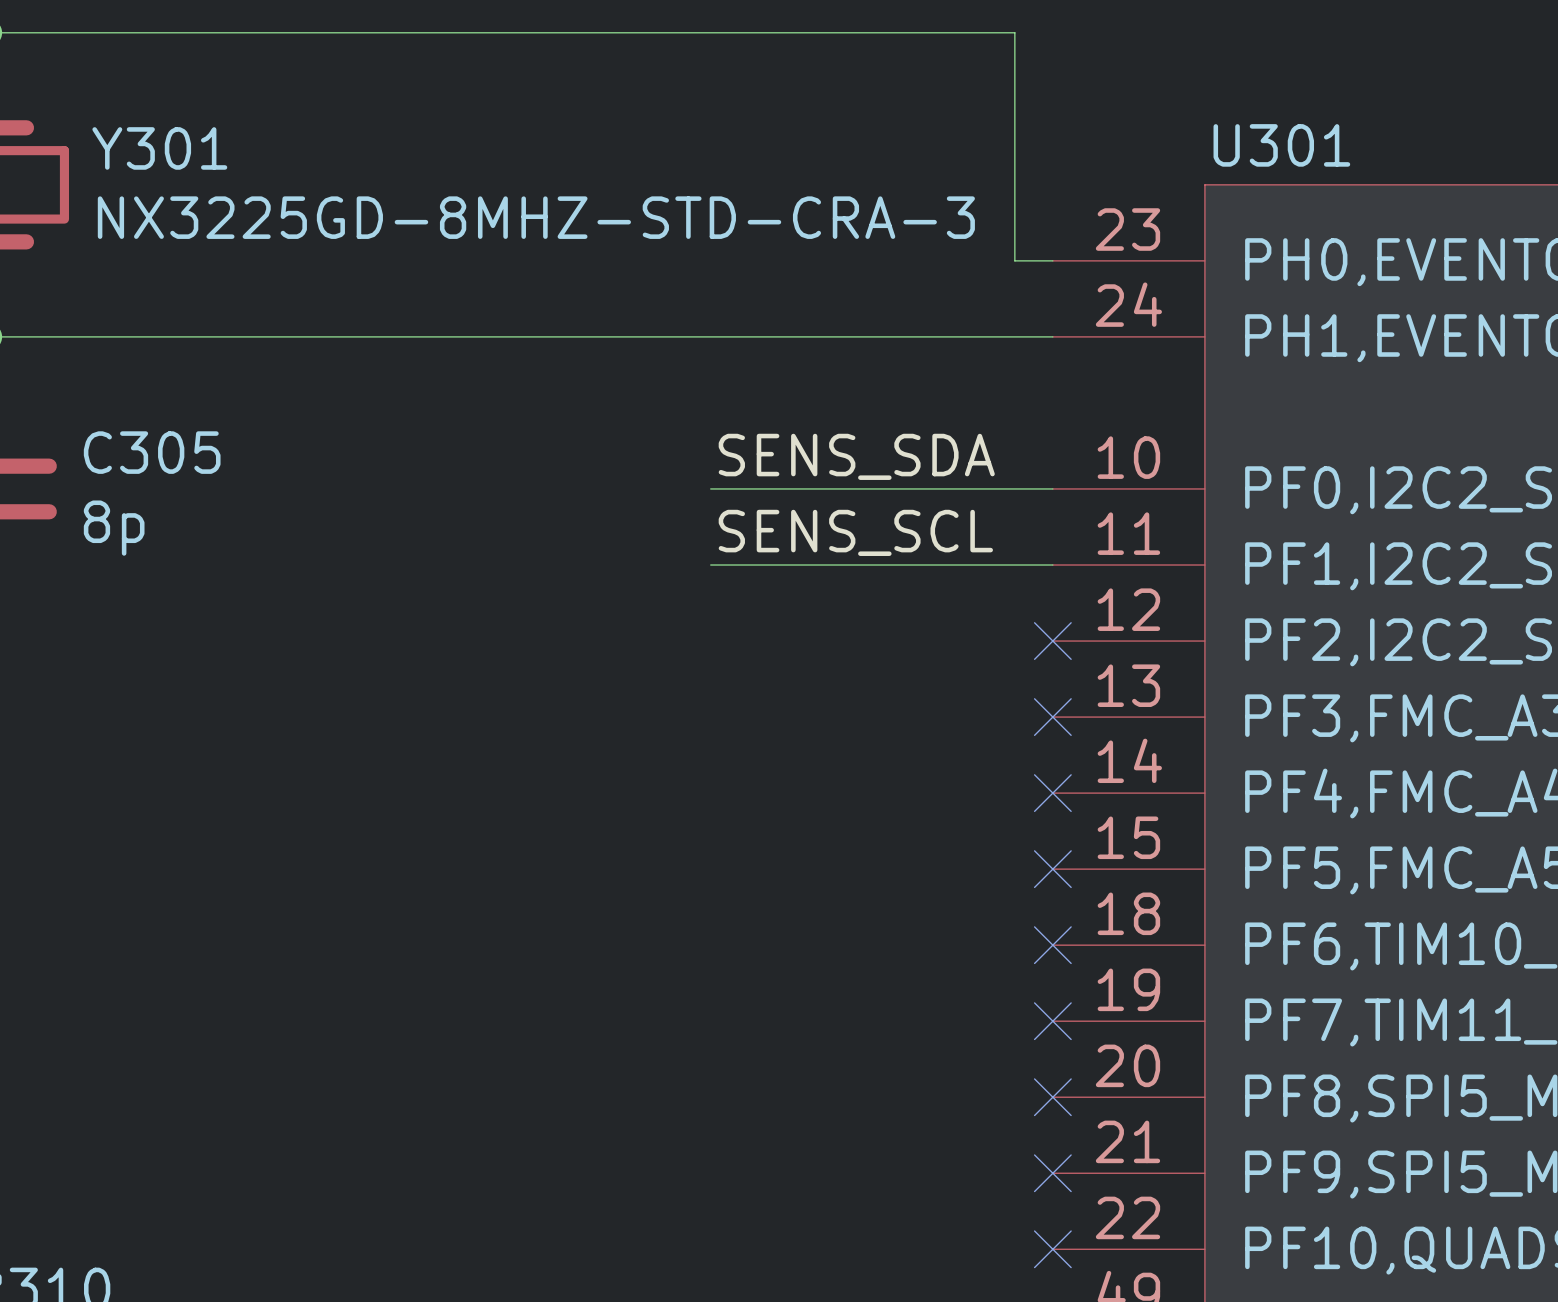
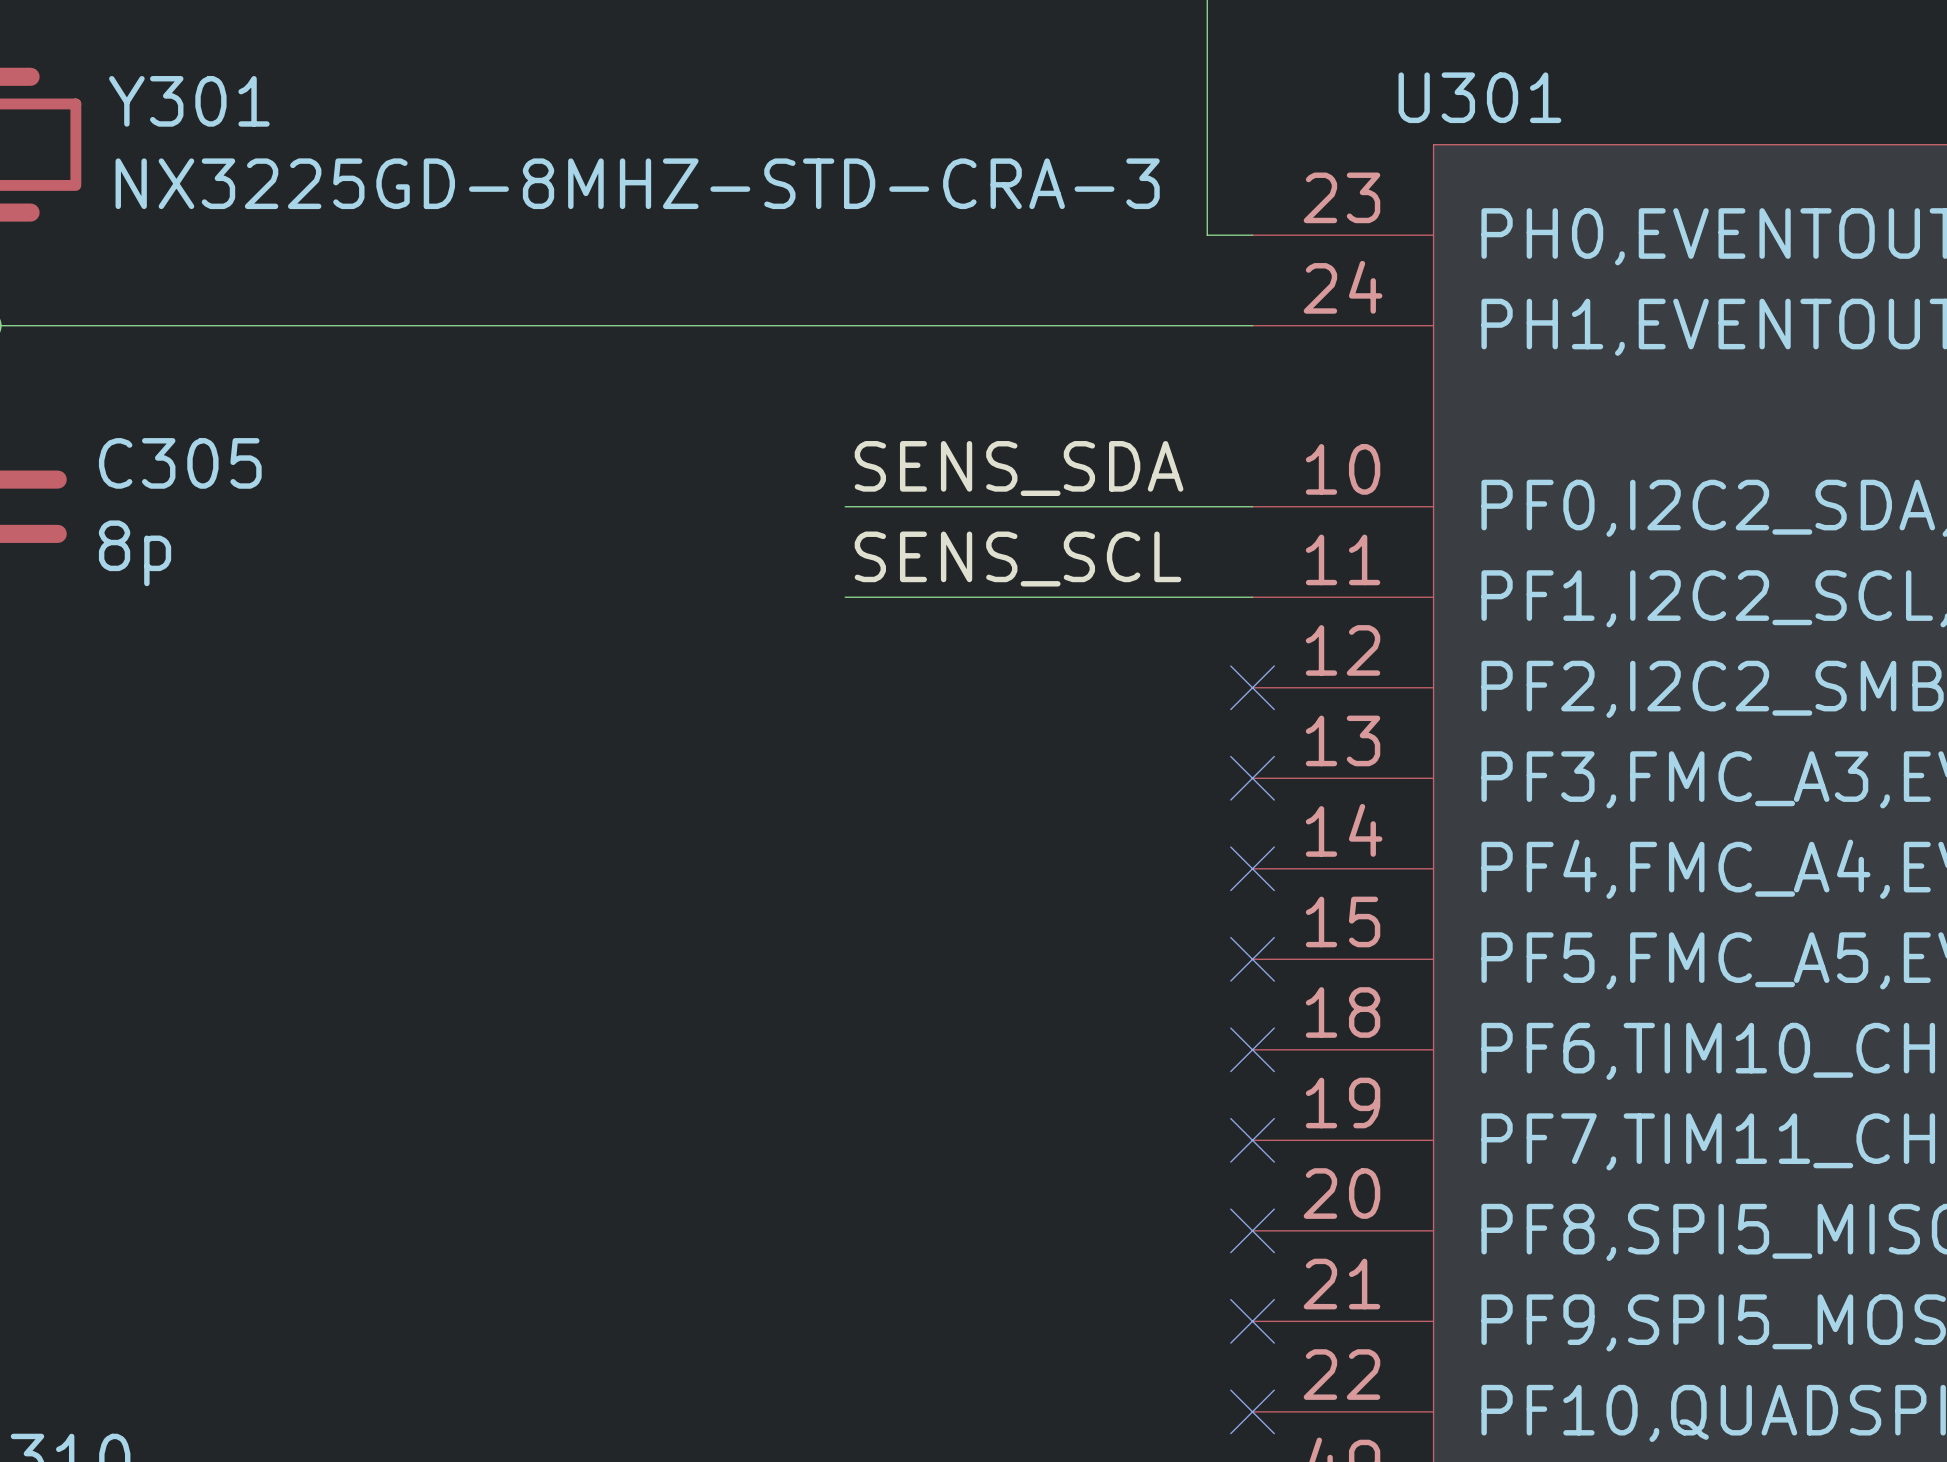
U301 name position: U301 (1281, 145) -> U301 (1479, 97)

